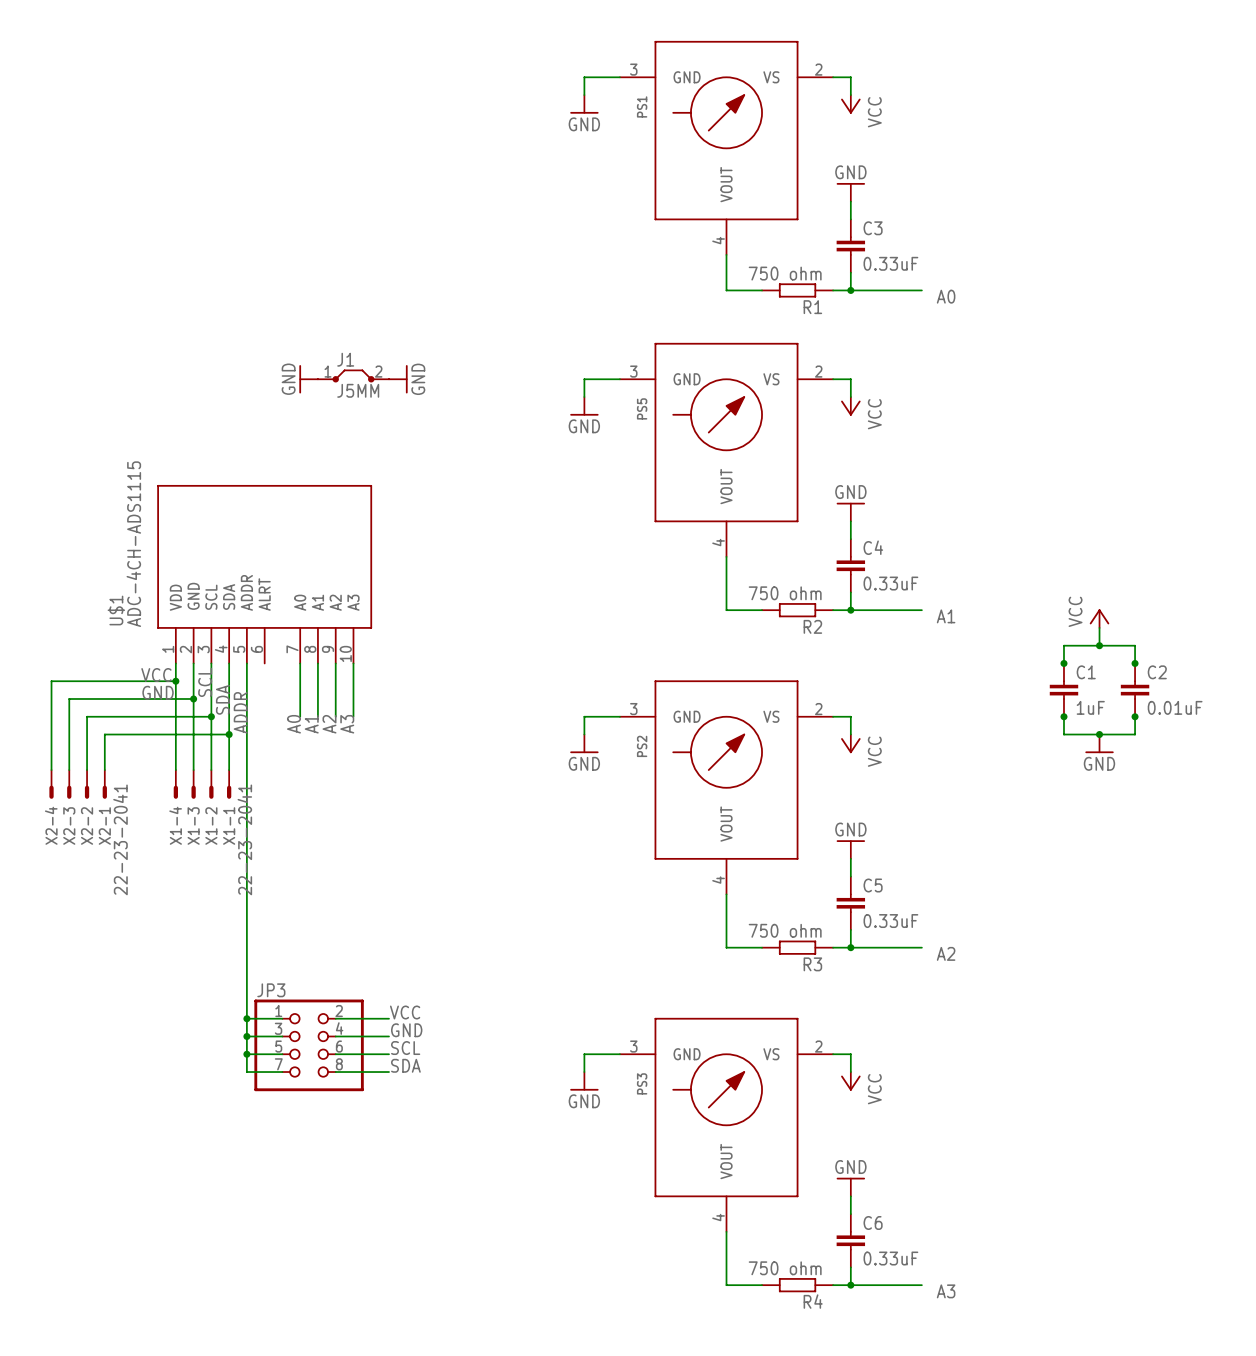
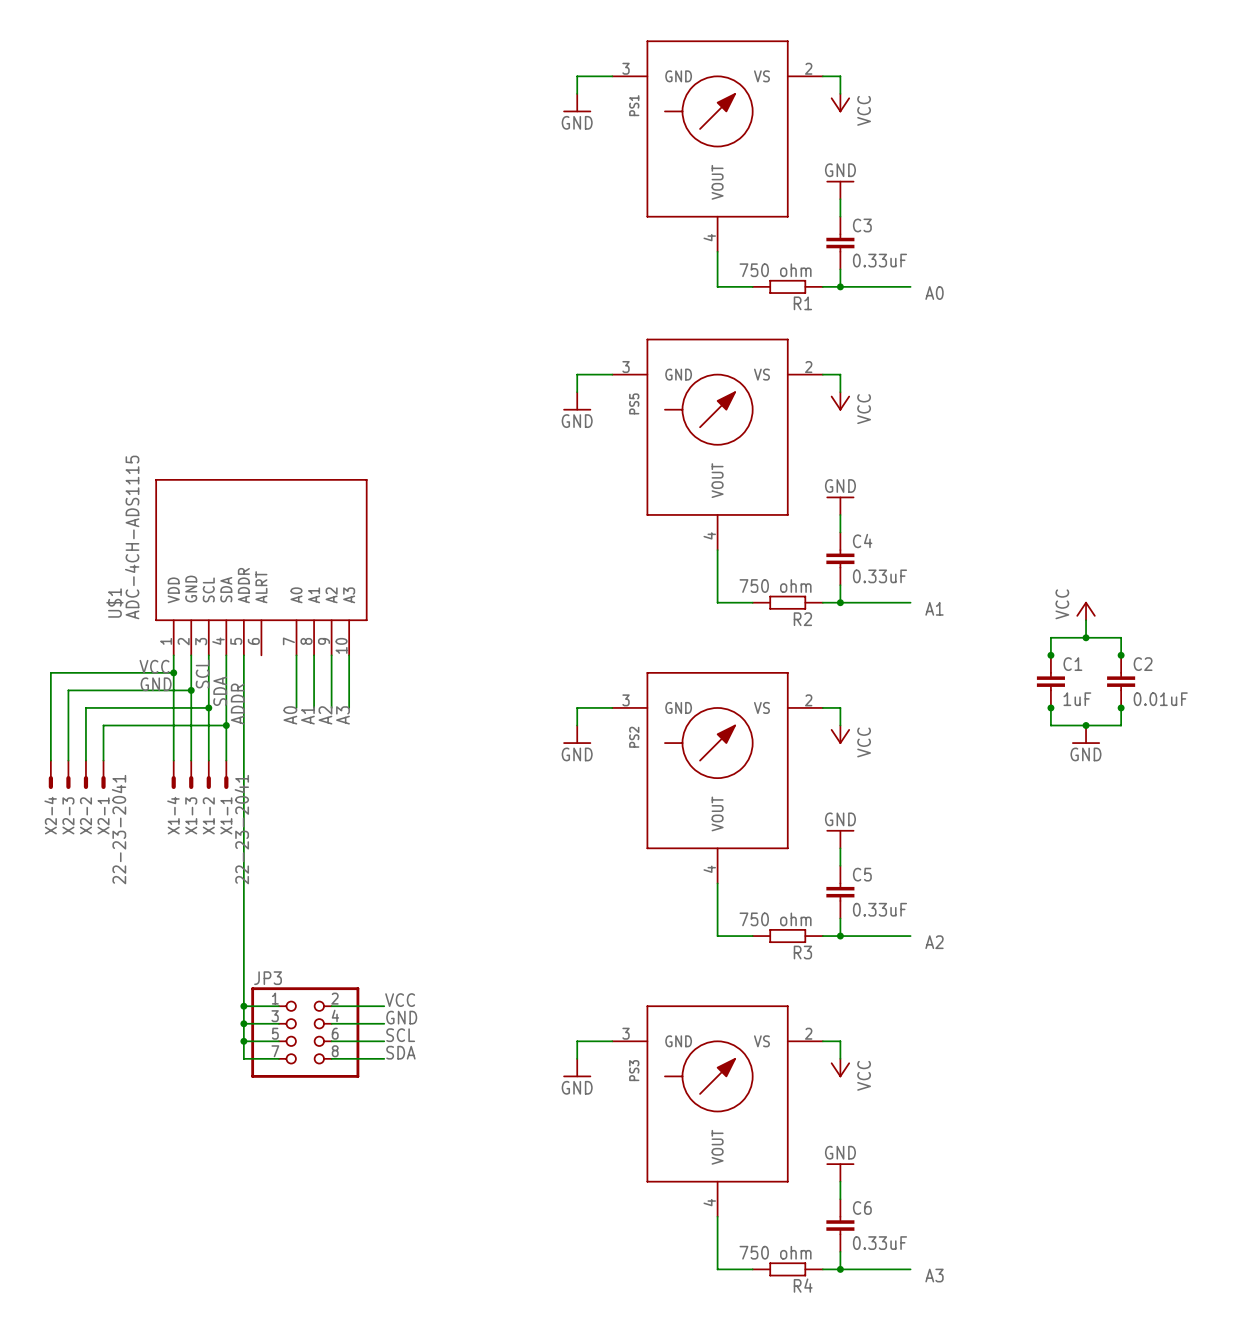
J1: J5MM (353, 376) -> none
power symbol: GND (308, 379) -> none
power symbol: GND (398, 379) -> none

